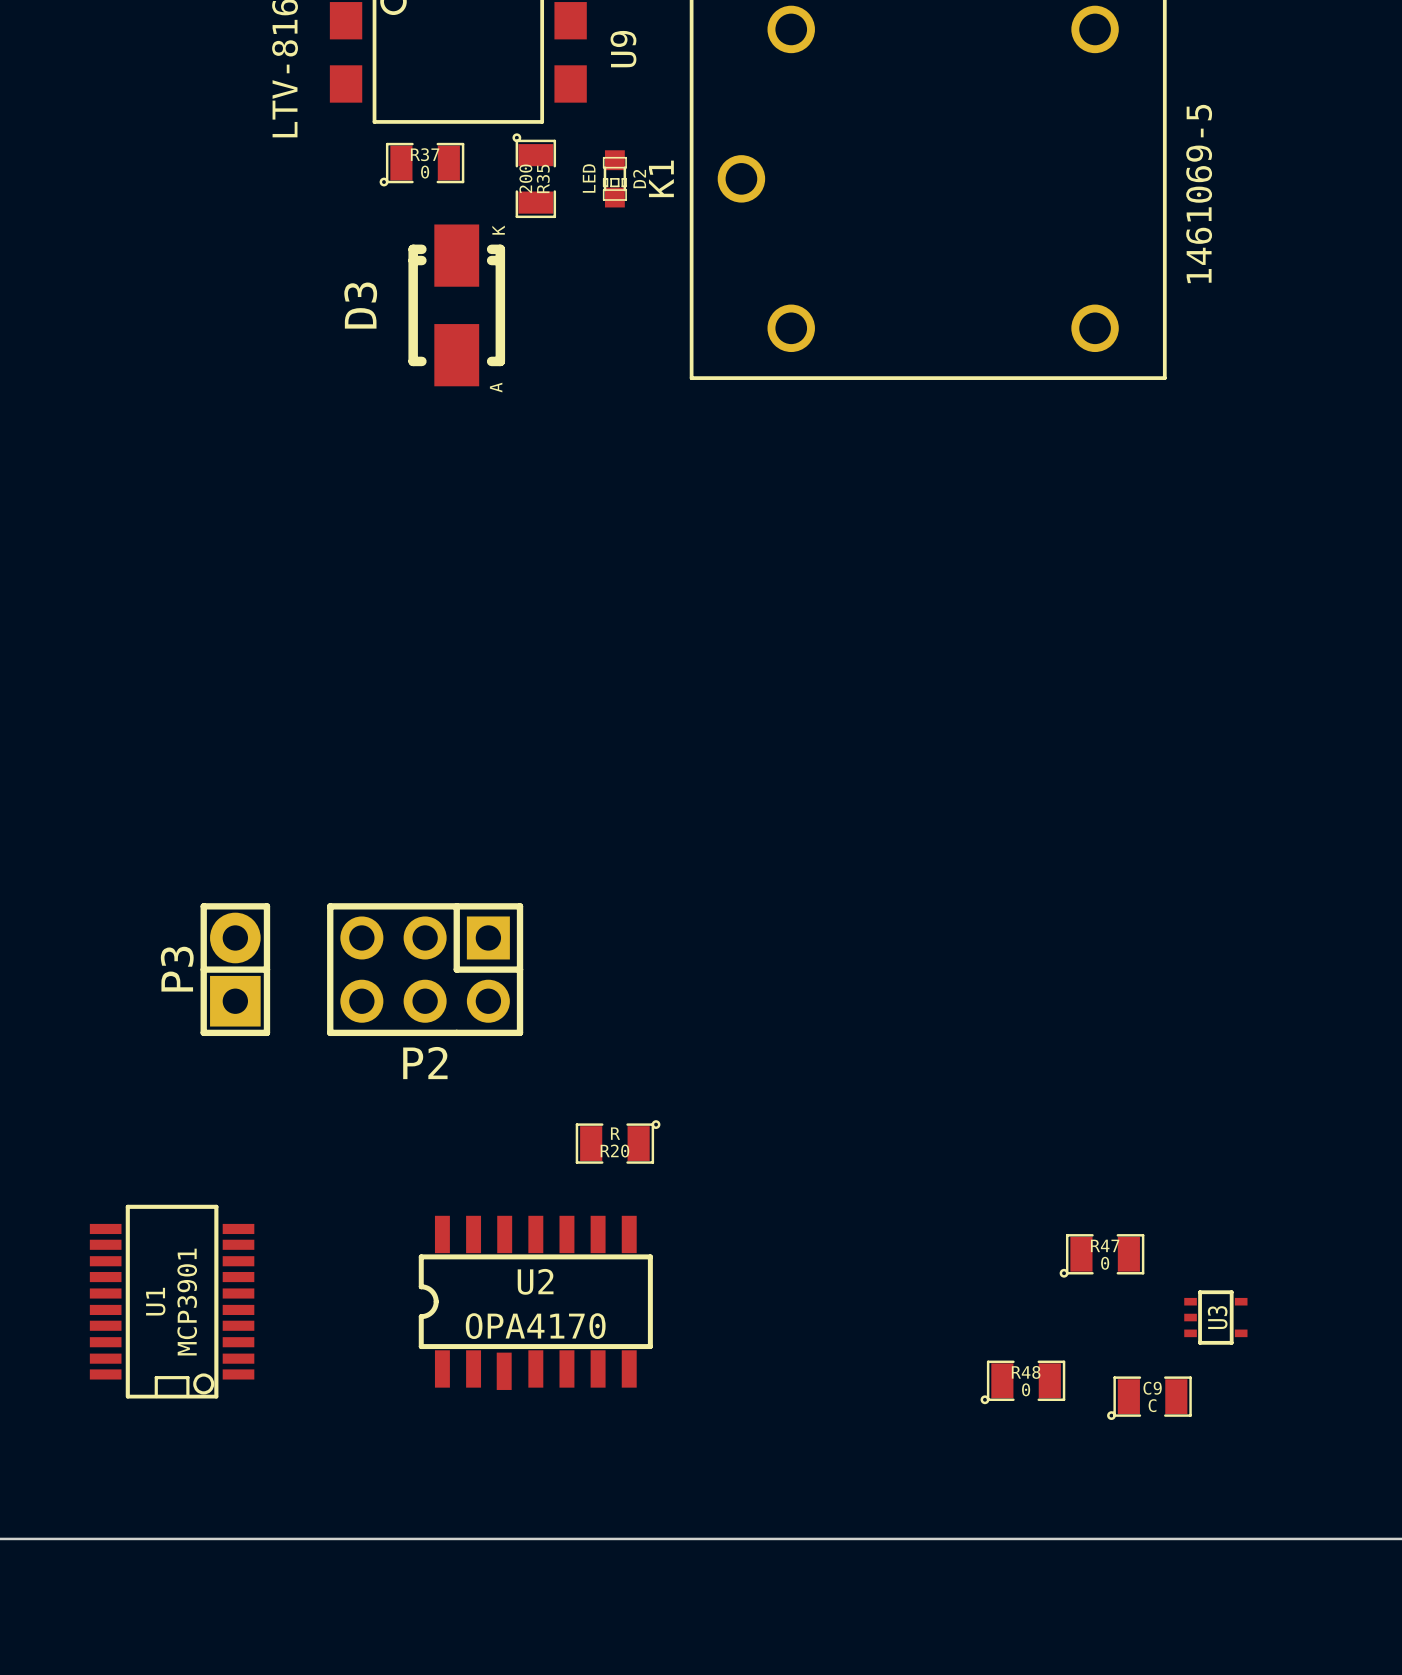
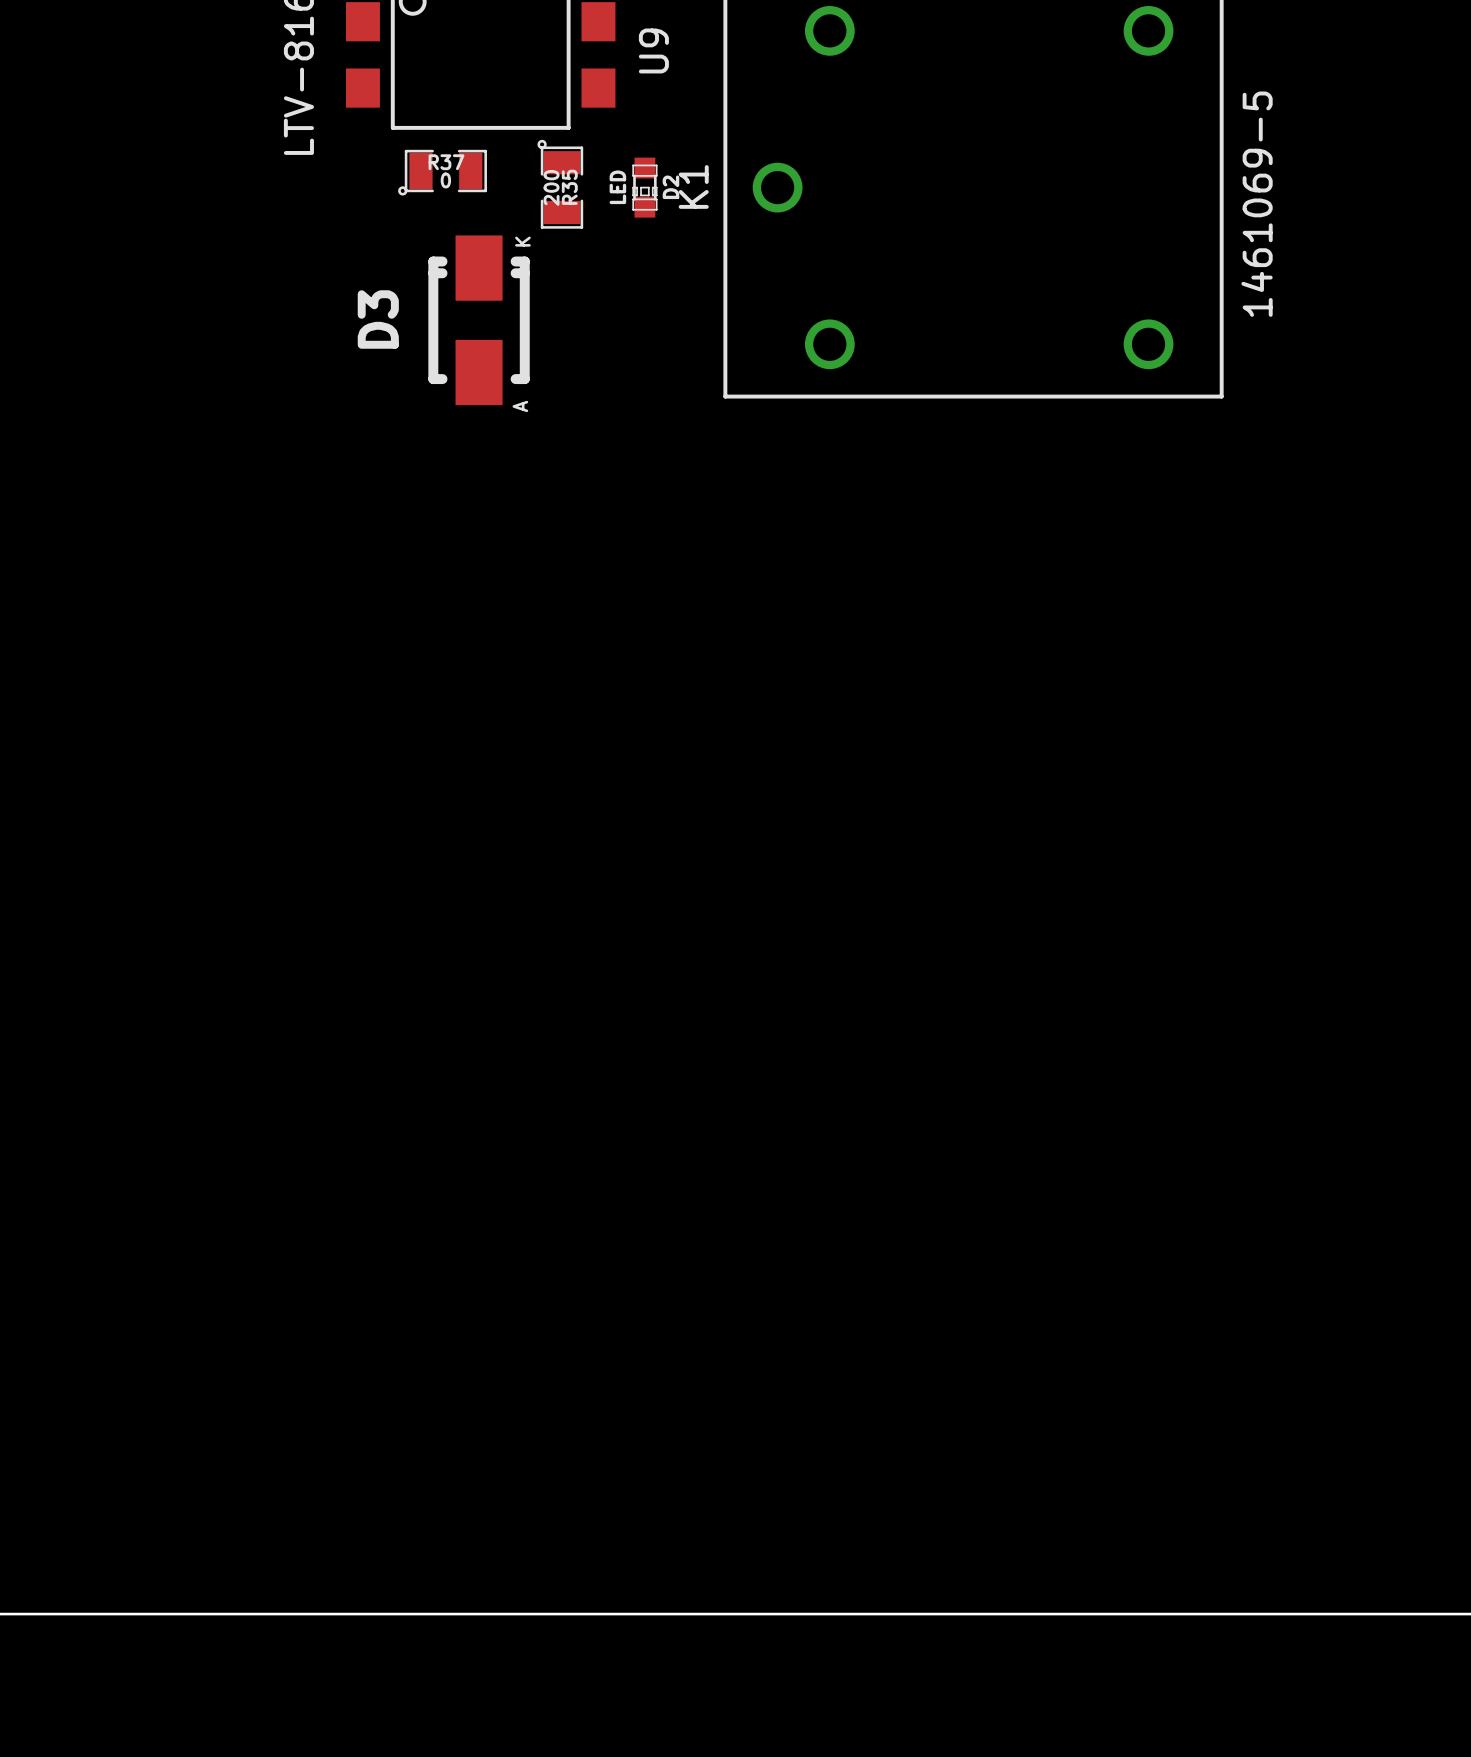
P3: (235, 969) -> none
P2: (425, 969) -> none
R20: R (618, 1141) -> none
R47: 0 (1102, 1255) -> none
U1: MCP3901 (172, 1301) -> none
U2: OPA4170 (535, 1302) -> none
U3: (1215, 1317) -> none
R48: 0 (1022, 1382) -> none
C9: C (1149, 1398) -> none

